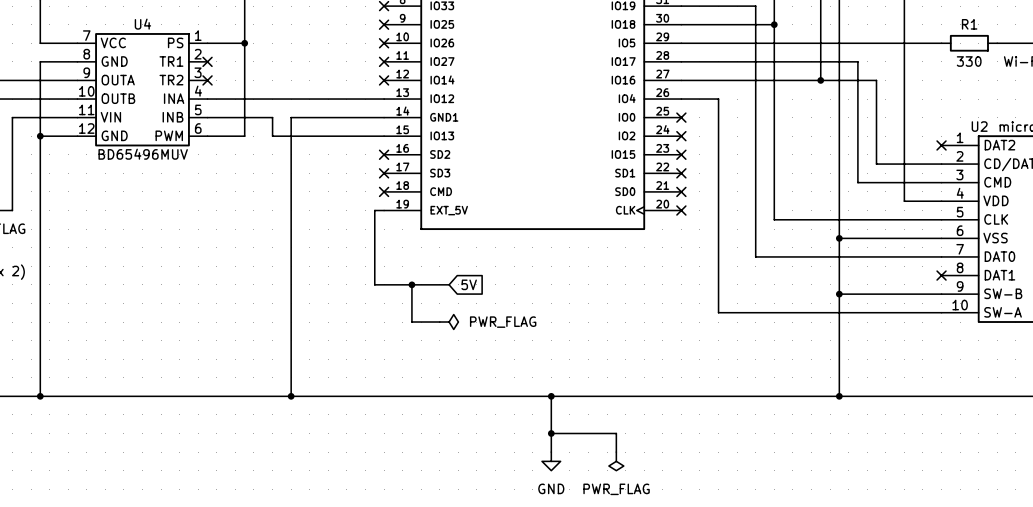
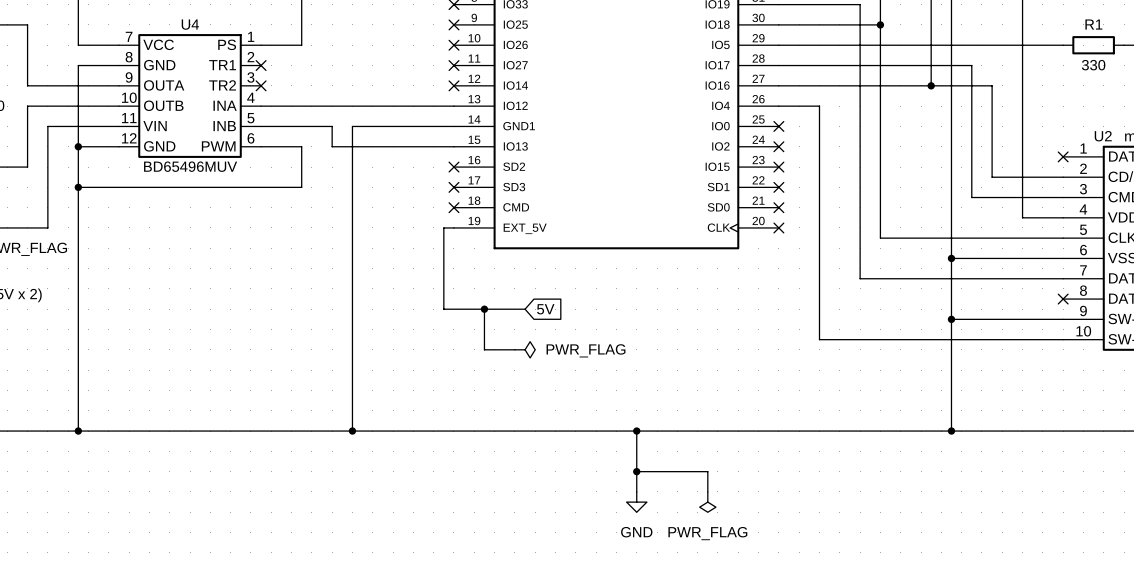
wire: (244, 43) (244, 136) -> (78, 187) (301, 187) (301, 146)
junction: (244, 43) -> none
junction: none -> (78, 187)

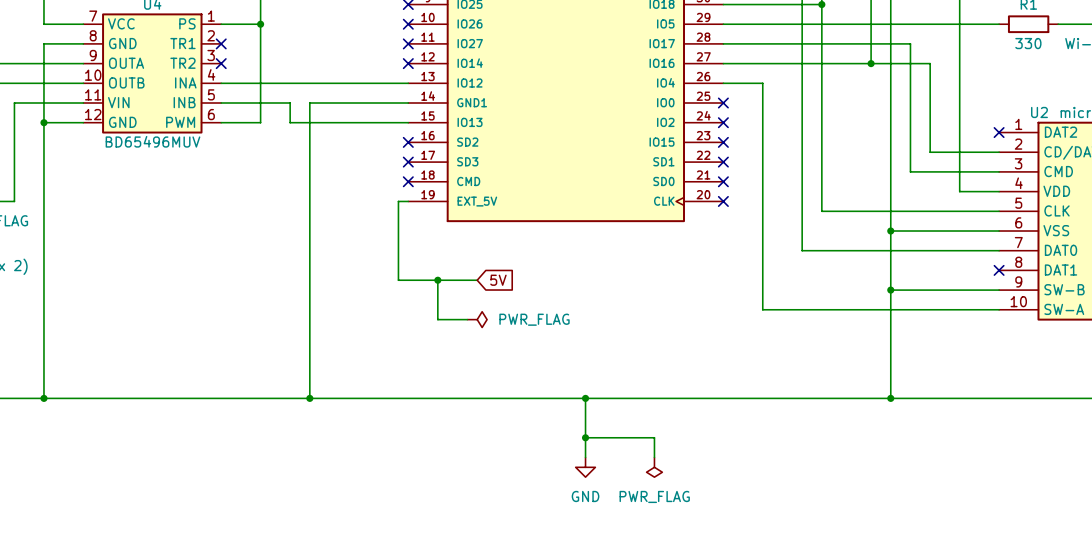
junction: none -> (260, 24)
wire: (301, 146) (301, 187) (78, 187) -> (260, 122) (260, 24)
junction: (78, 187) -> none

